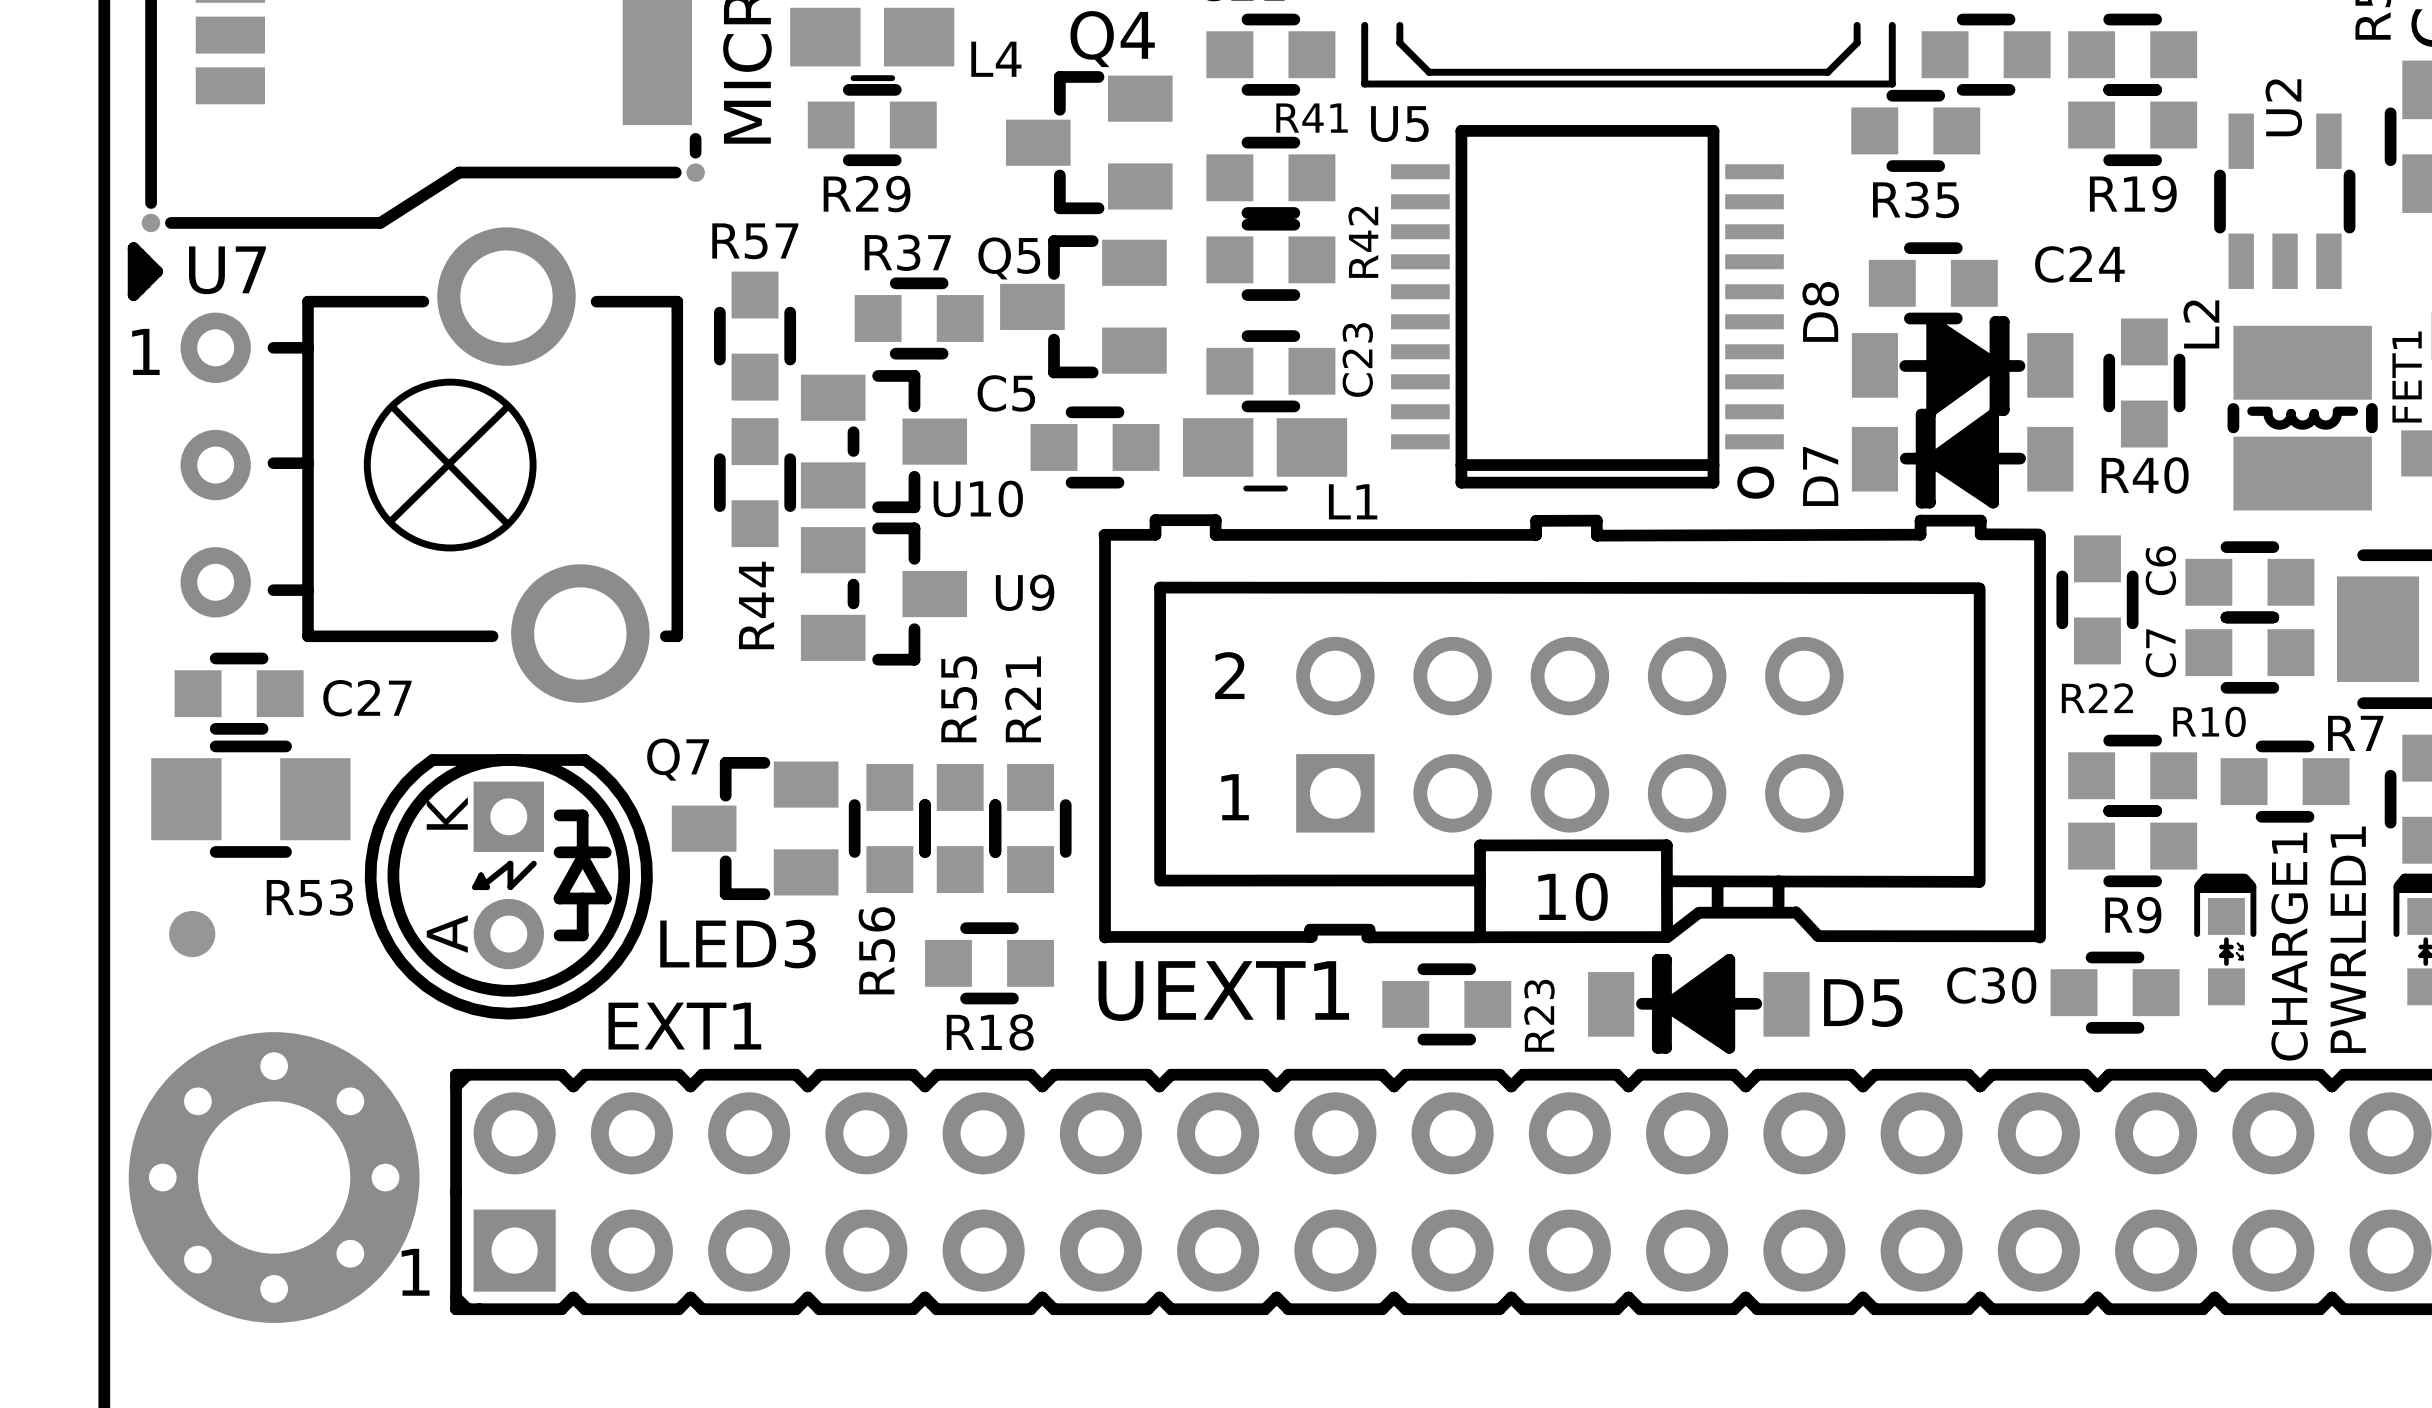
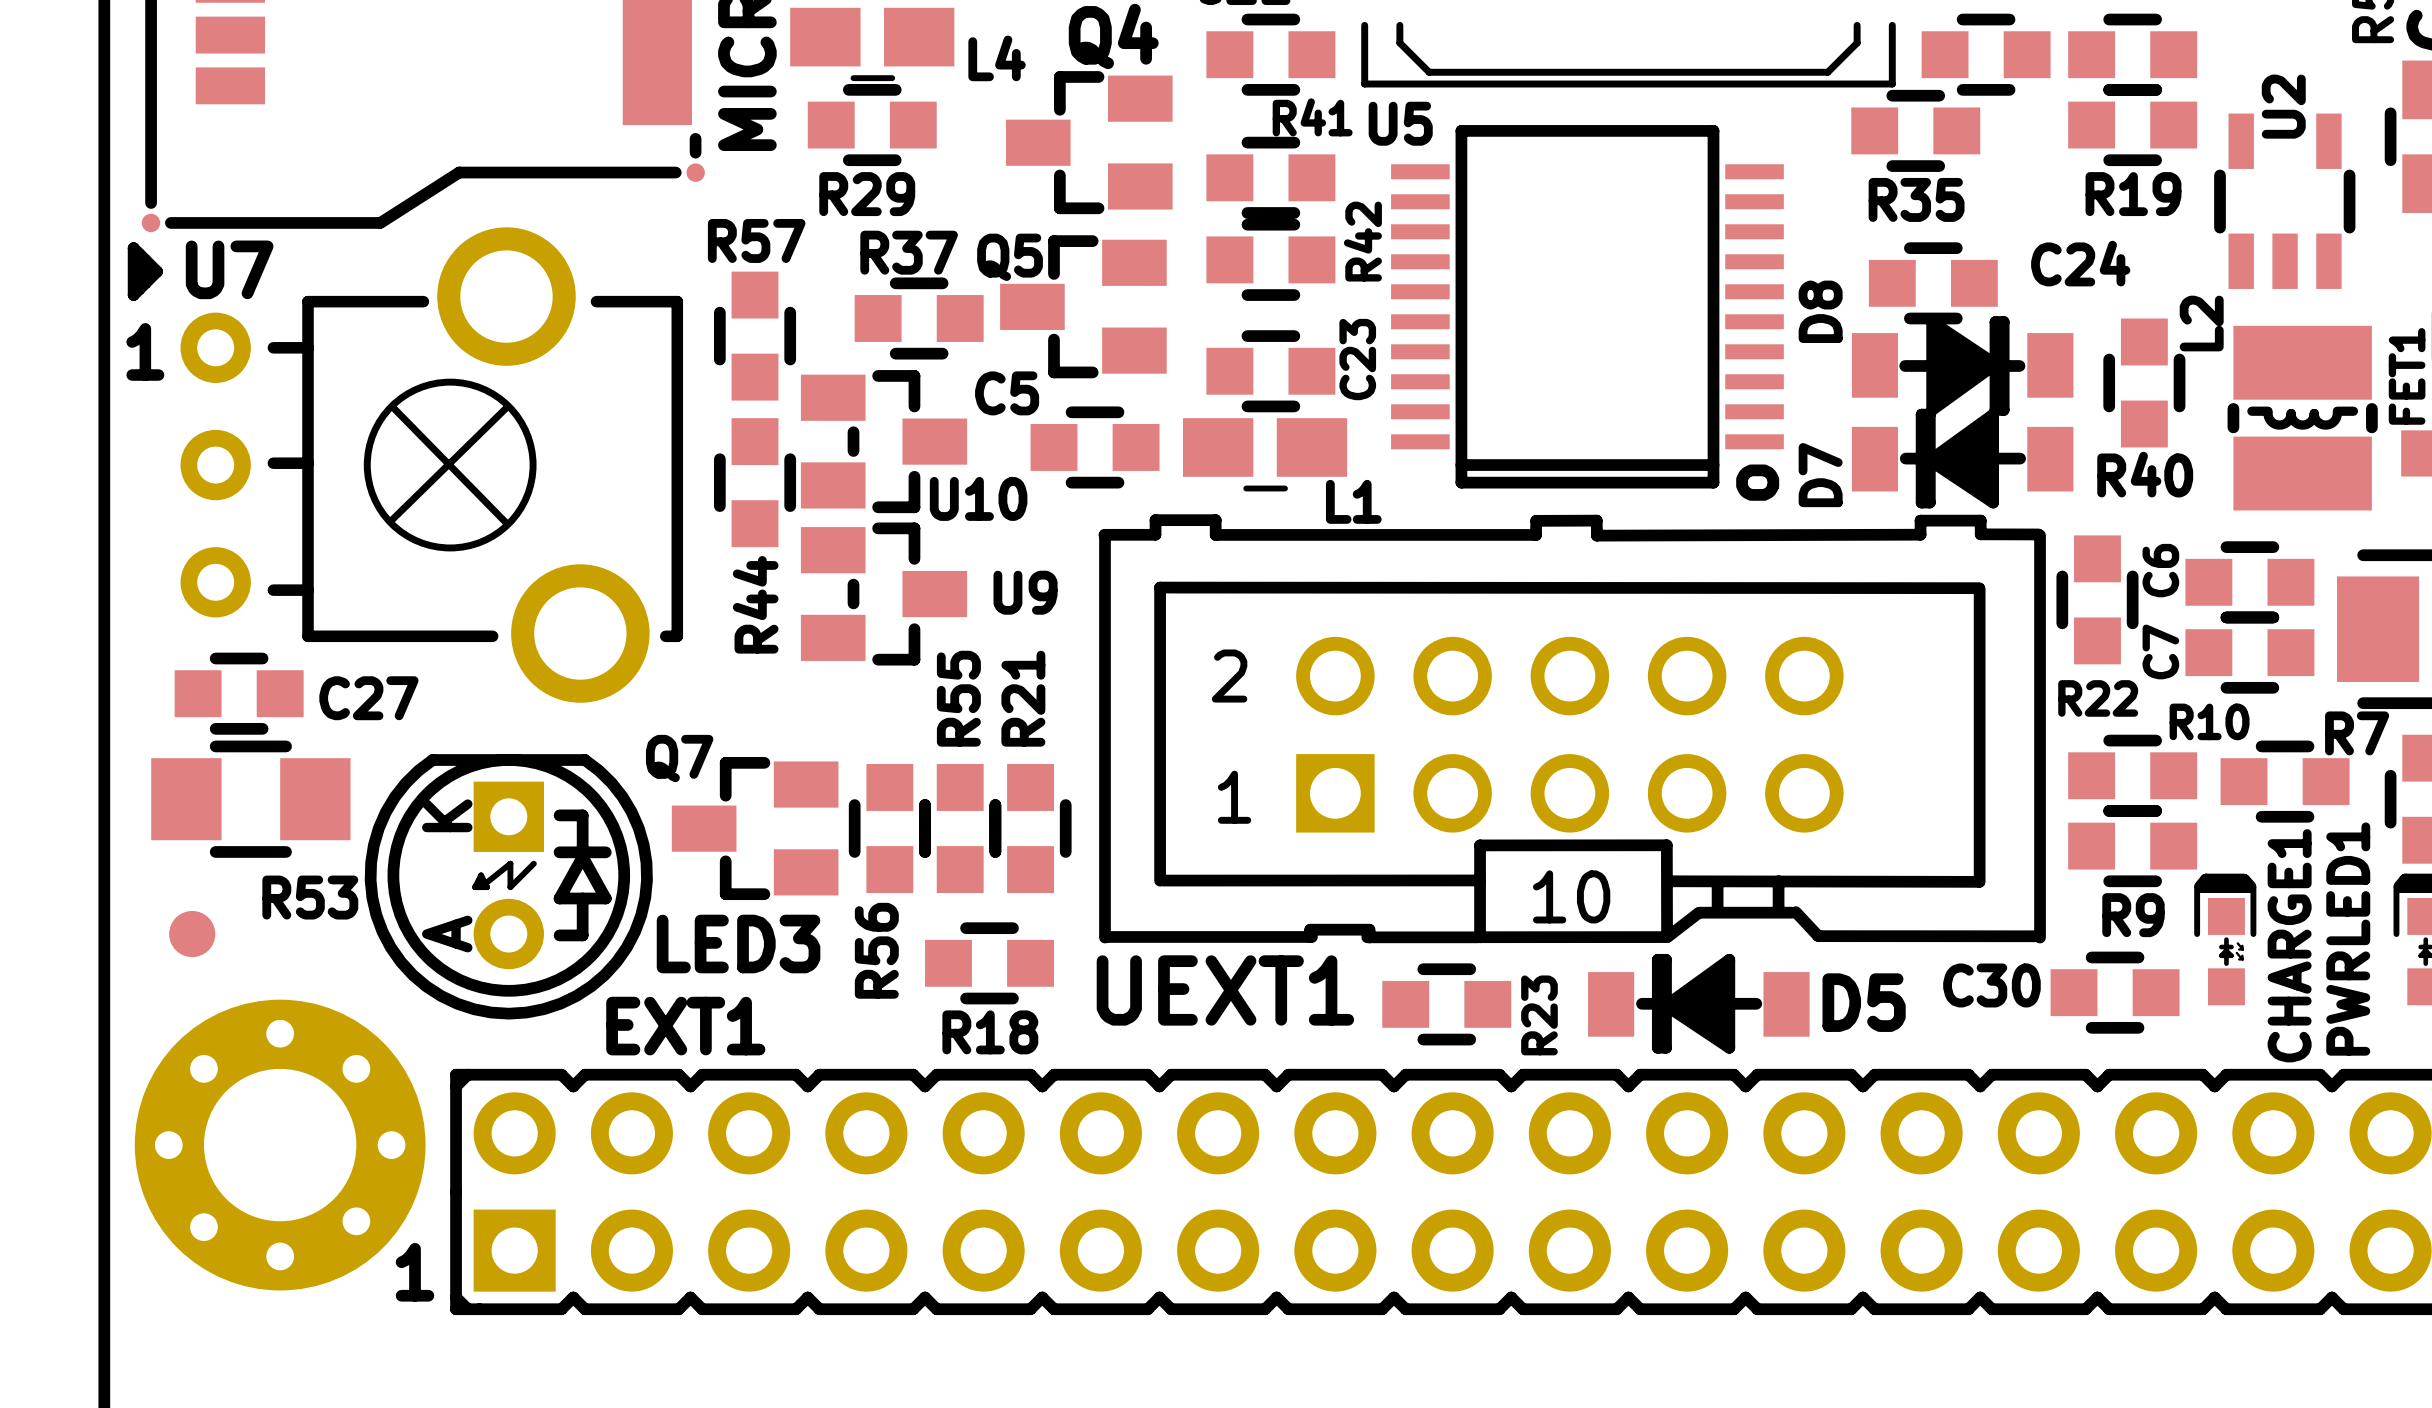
part position: (274, 1177) -> (280, 1145)

